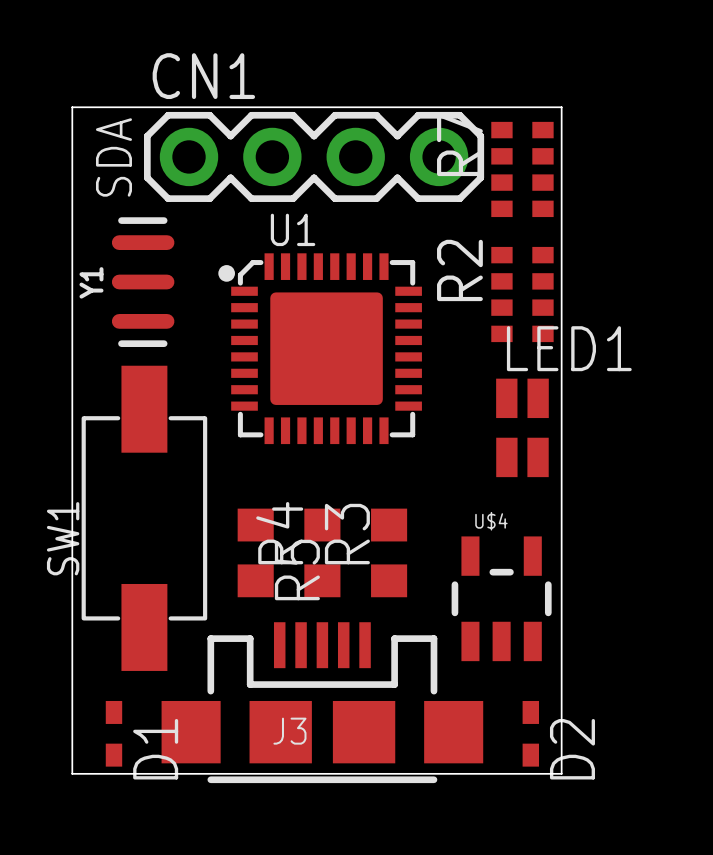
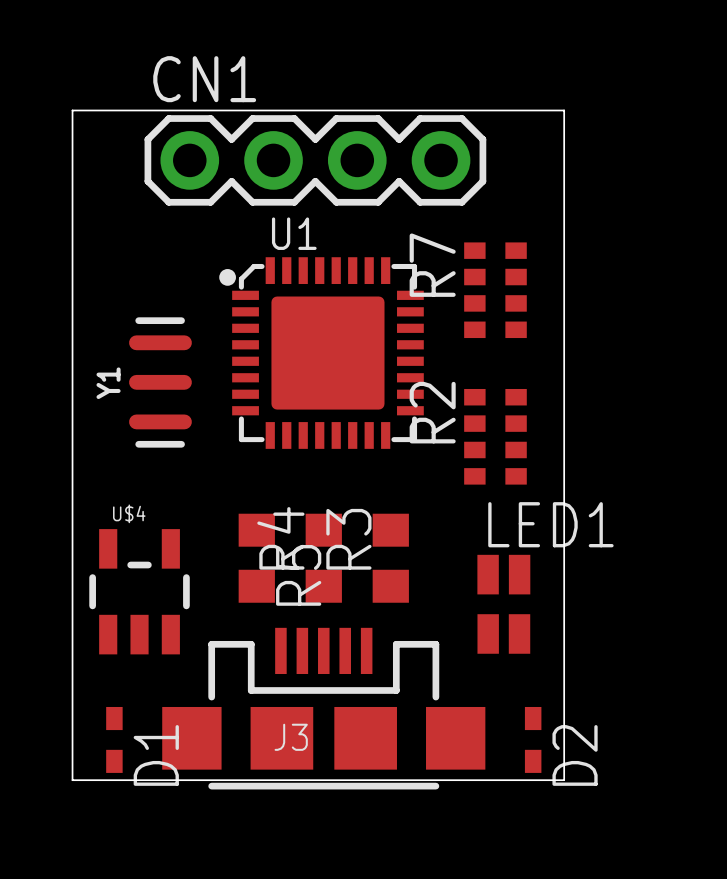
text: SDA (113, 157) -> none
R7 position: (522, 169) -> (495, 290)
Y1 position: (143, 282) -> (160, 382)
R2 position: (522, 294) -> (495, 436)
LED1 position: (522, 427) -> (503, 604)
SW1: (144, 518) -> none
U$4 position: (501, 598) -> (139, 591)

